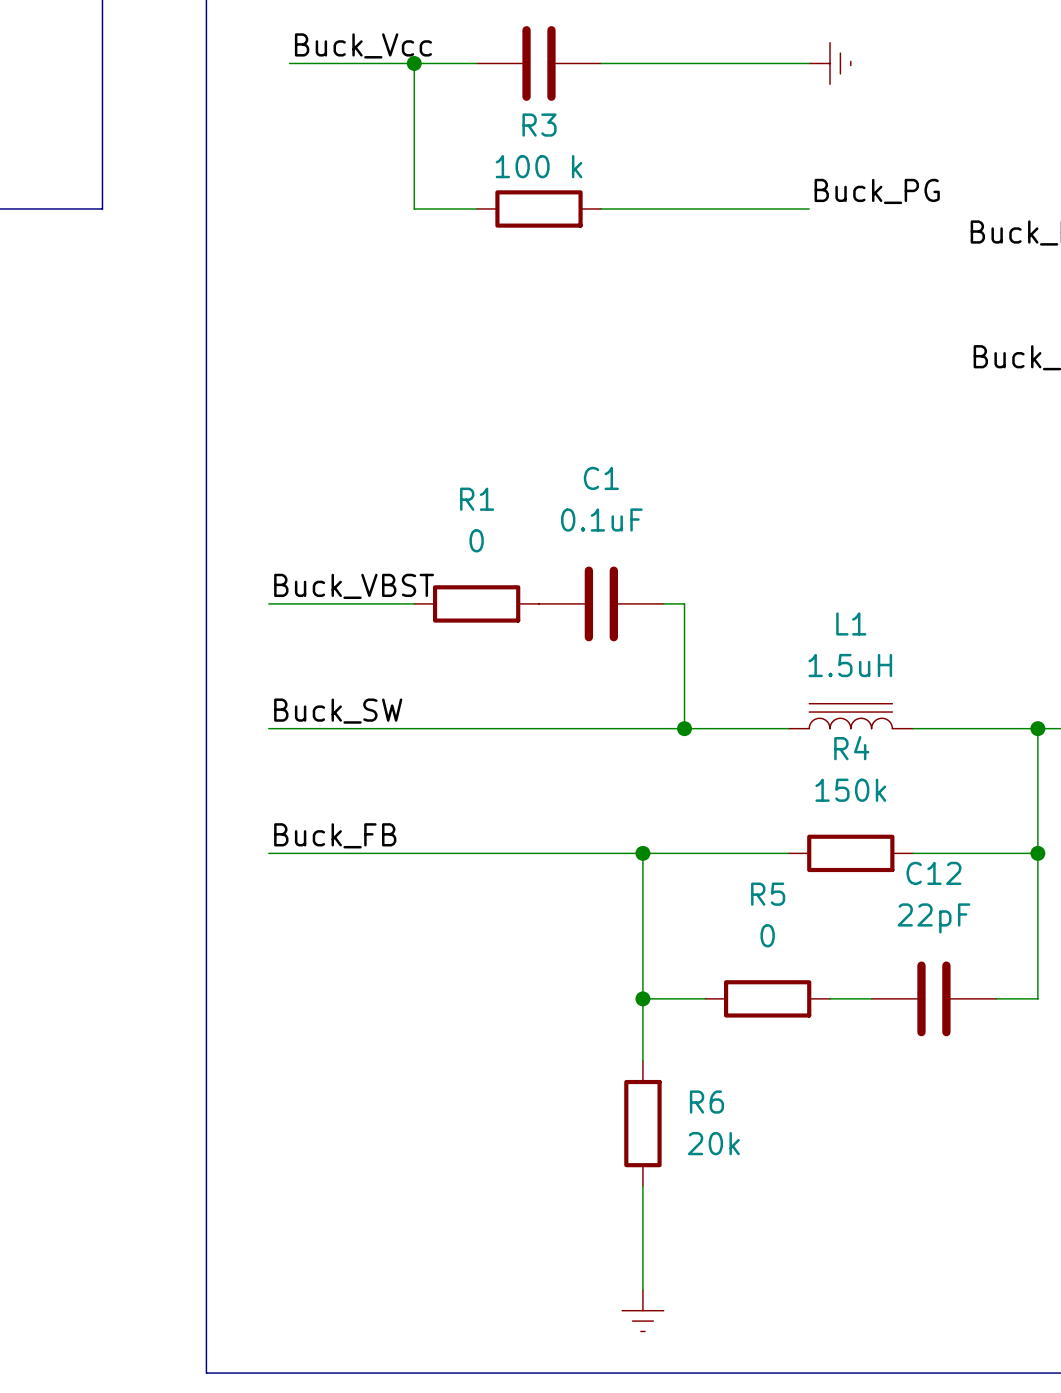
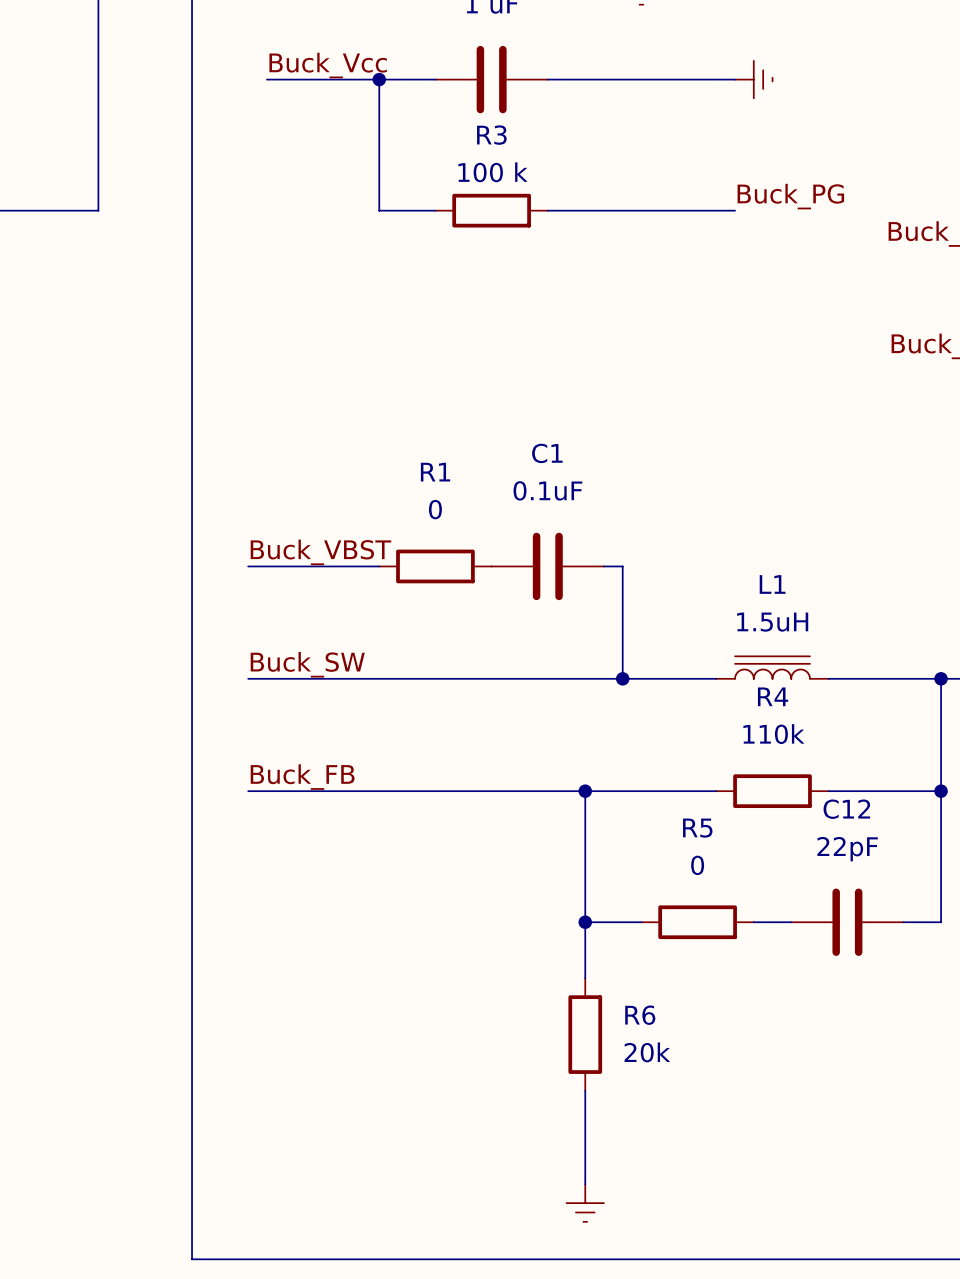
R4 value: 150k (850, 790) -> 110k (773, 734)

